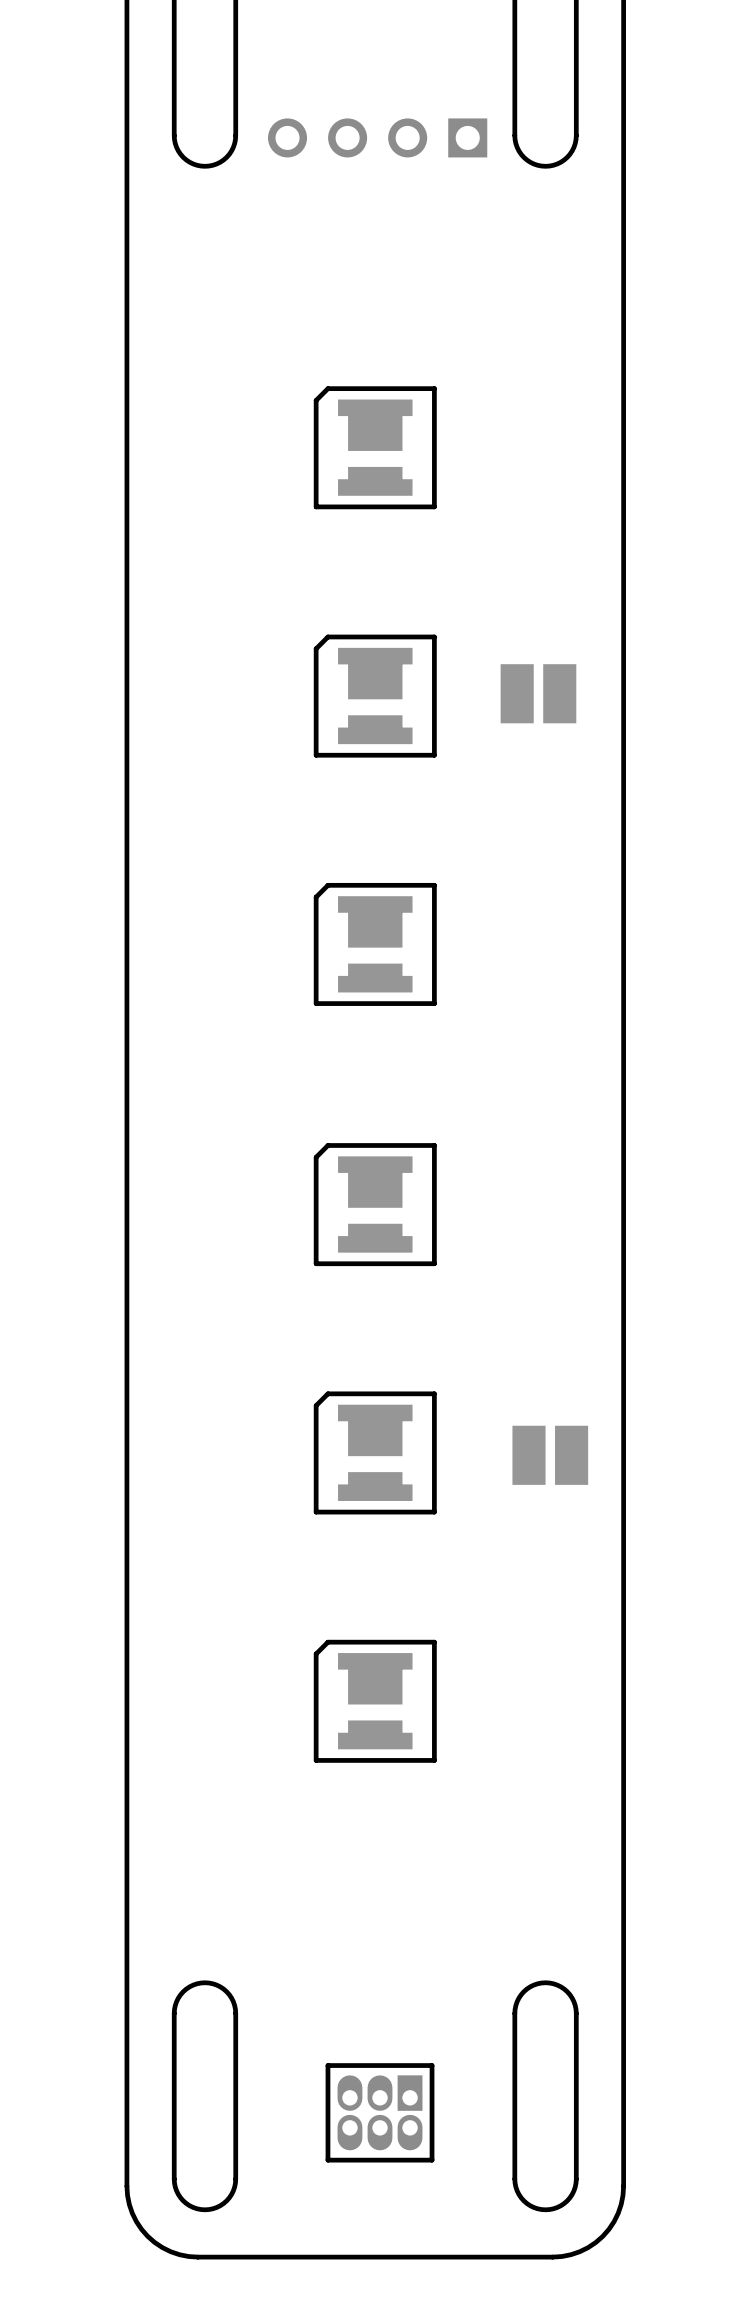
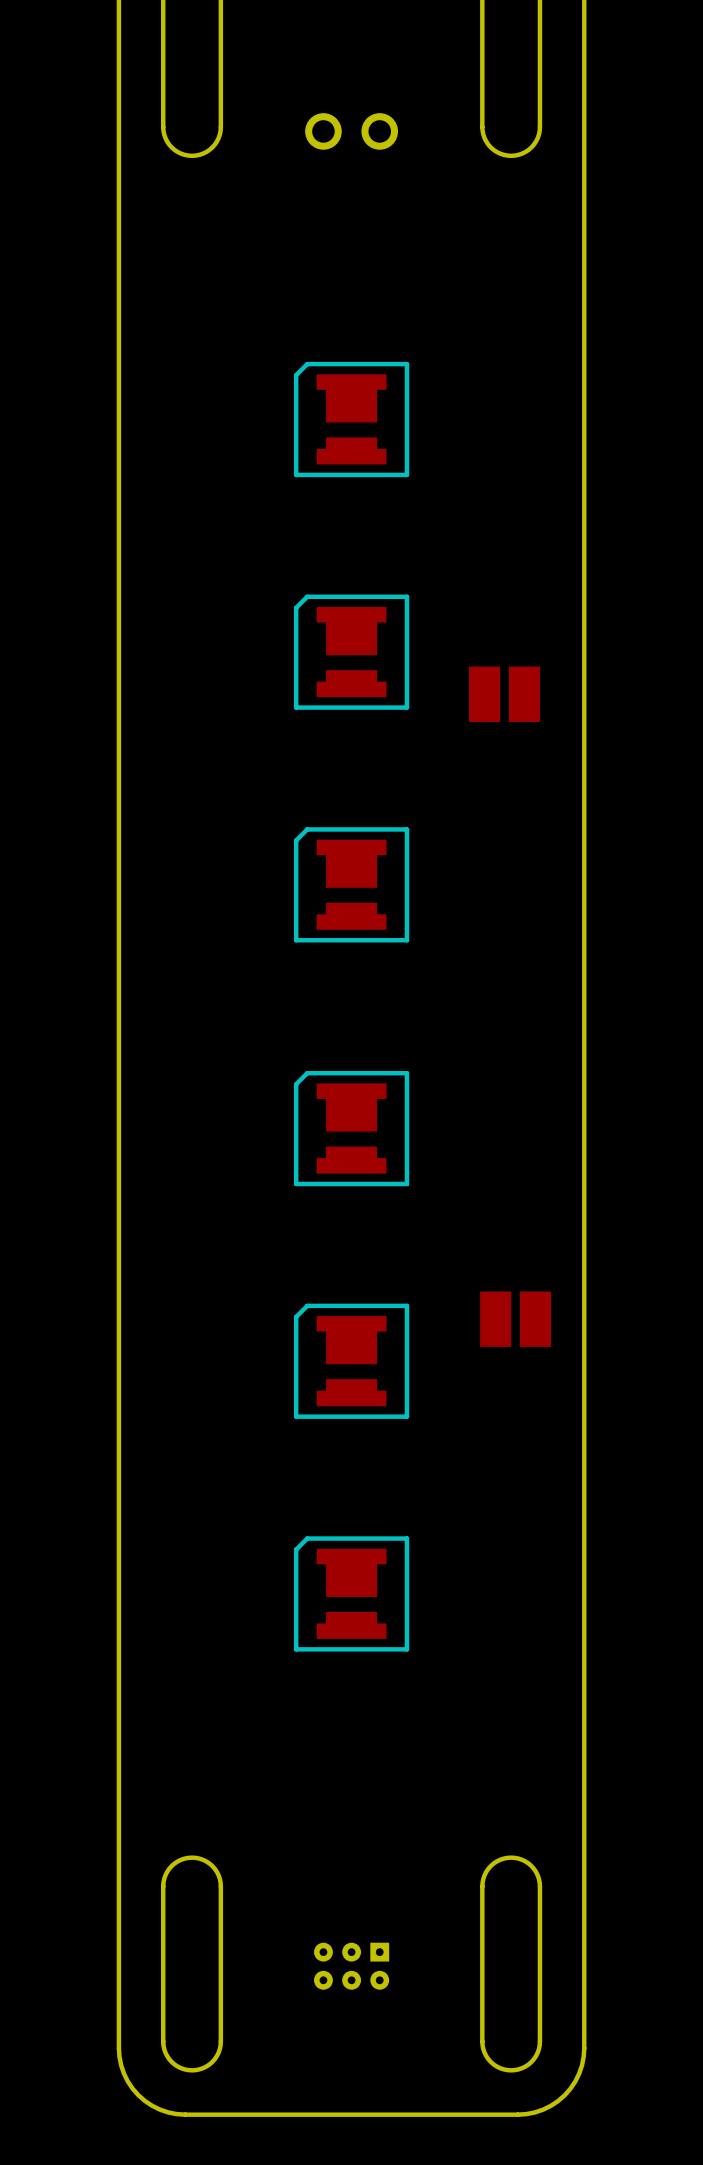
part footprint: [268, 118, 488, 158] -> [305, 113, 399, 150]
part position: (538, 693) -> (504, 694)
part position: (550, 1455) -> (515, 1319)
part footprint: [325, 2063, 435, 2163] -> [314, 1942, 390, 1990]

